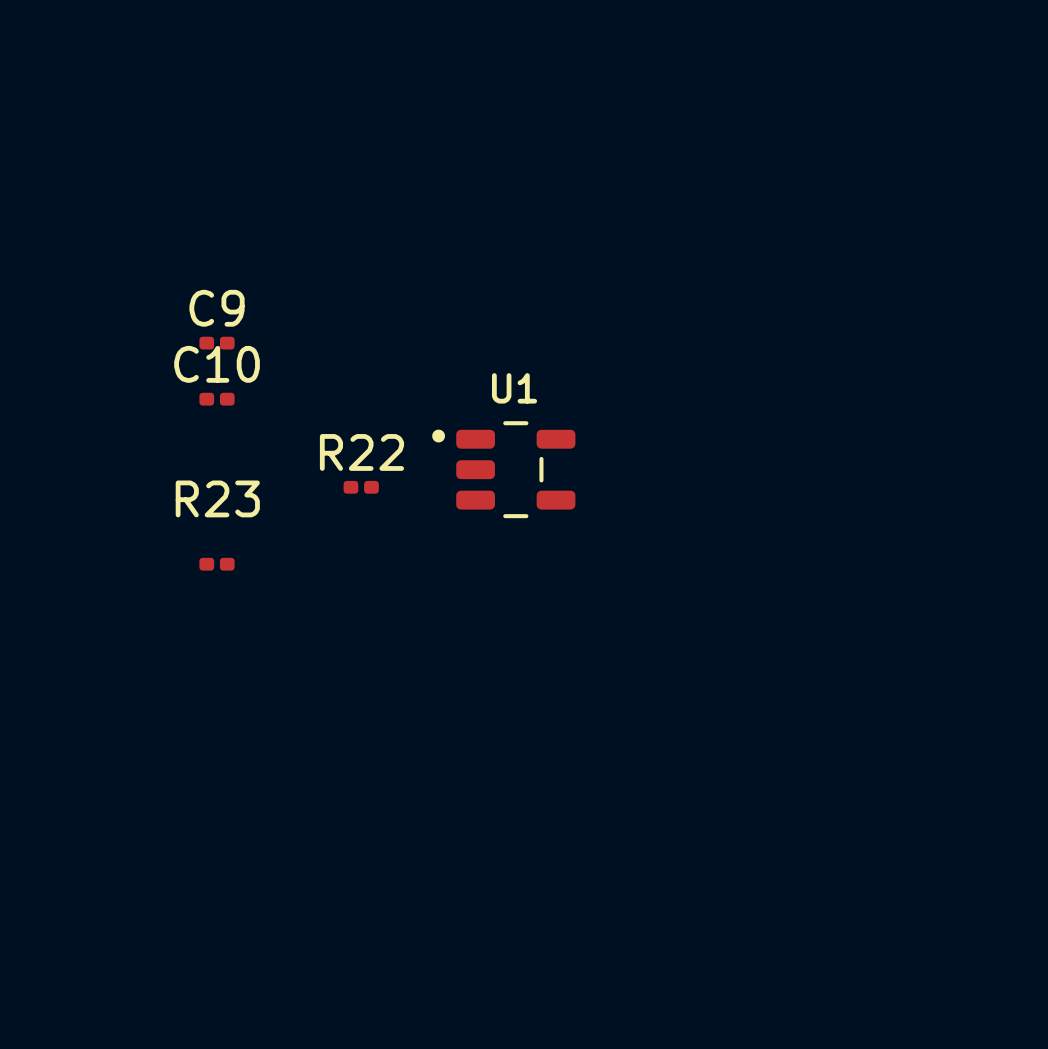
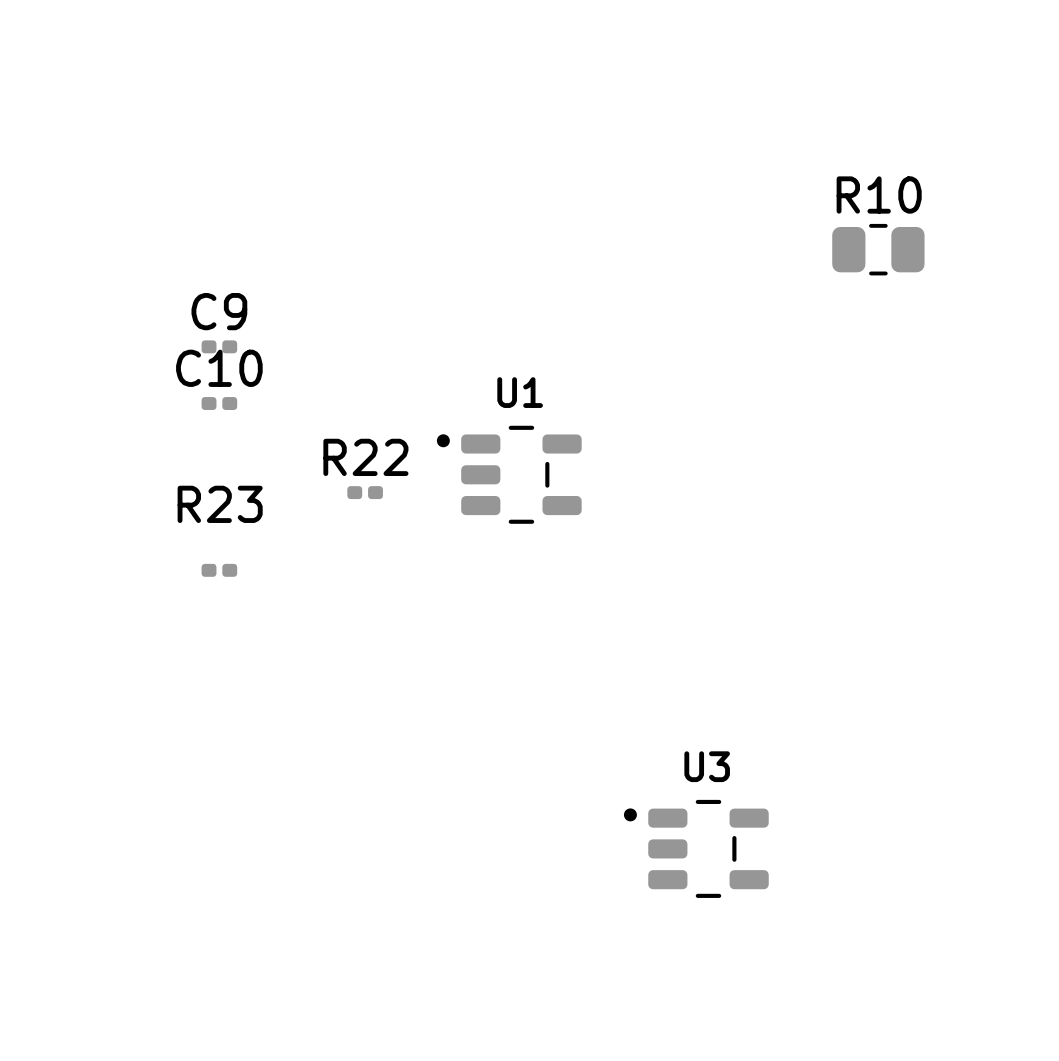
R10: none -> (878, 249)
U3: none -> (696, 848)

